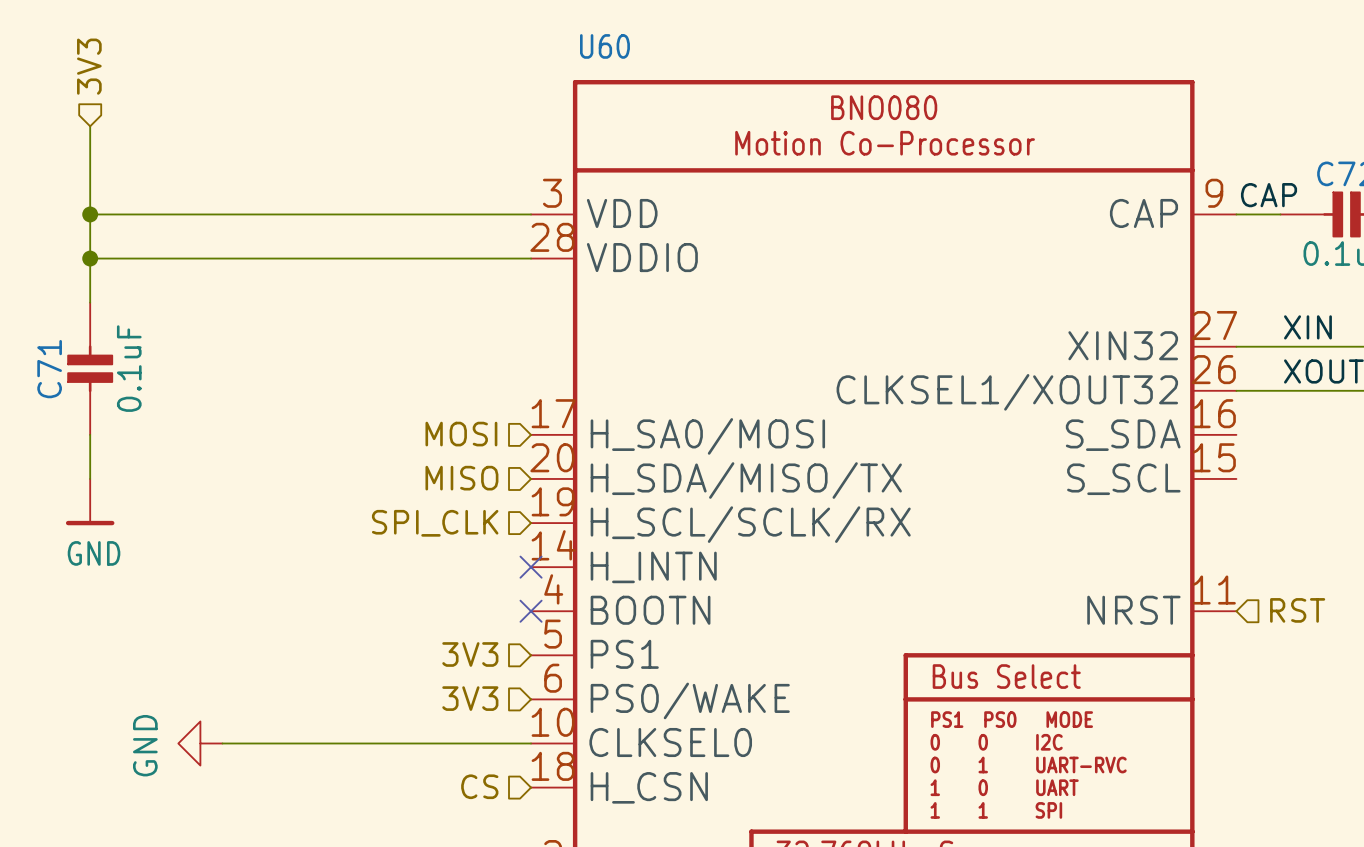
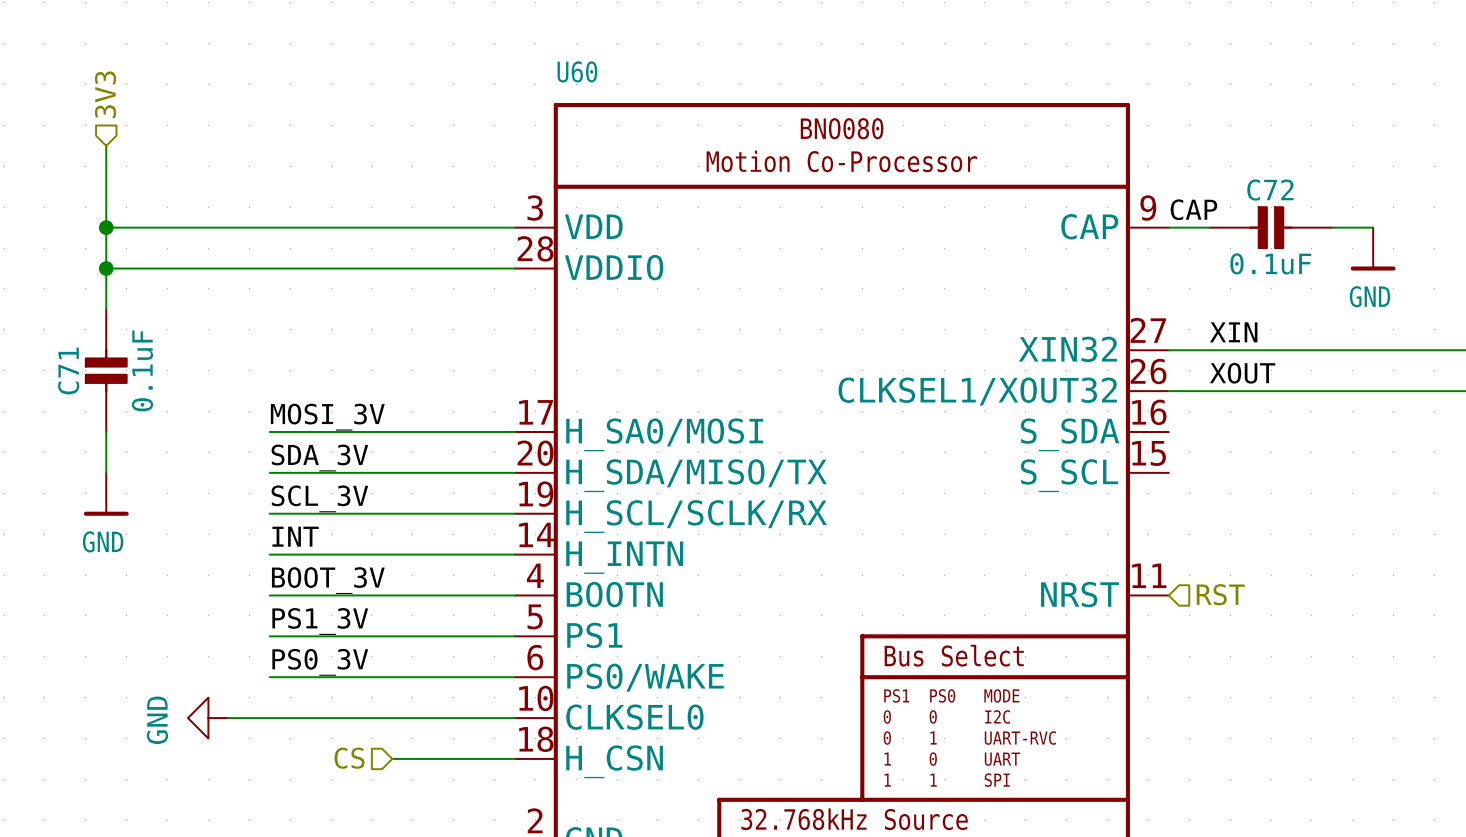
label: none -> MOSI_3V (327, 417)
wire: none -> (269, 431) (514, 431)
hierarchical label: MOSI (461, 434) -> none
label: none -> SDA_3V (319, 458)
wire: none -> (269, 472) (514, 472)
hierarchical label: MISO (461, 478) -> none
label: none -> SCL_3V (319, 498)
wire: none -> (269, 513) (514, 513)
hierarchical label: SPI_CLK (435, 523) -> none
label: none -> INT (295, 536)
wire: none -> (269, 554) (514, 554)
no-connect mark: (531, 567) -> none
label: none -> BOOT_3V (328, 580)
wire: none -> (269, 595) (514, 595)
no-connect mark: (531, 611) -> none
label: none -> PS1_3V (320, 621)
hierarchical label: 3V3 (470, 654) -> none
wire: none -> (269, 636) (514, 636)
label: none -> PS0_3V (320, 662)
hierarchical label: 3V3 (470, 698) -> none
wire: none -> (269, 677) (514, 677)
hierarchical label position: CS (479, 786) -> CS (349, 758)
wire: none -> (392, 758) (514, 758)

